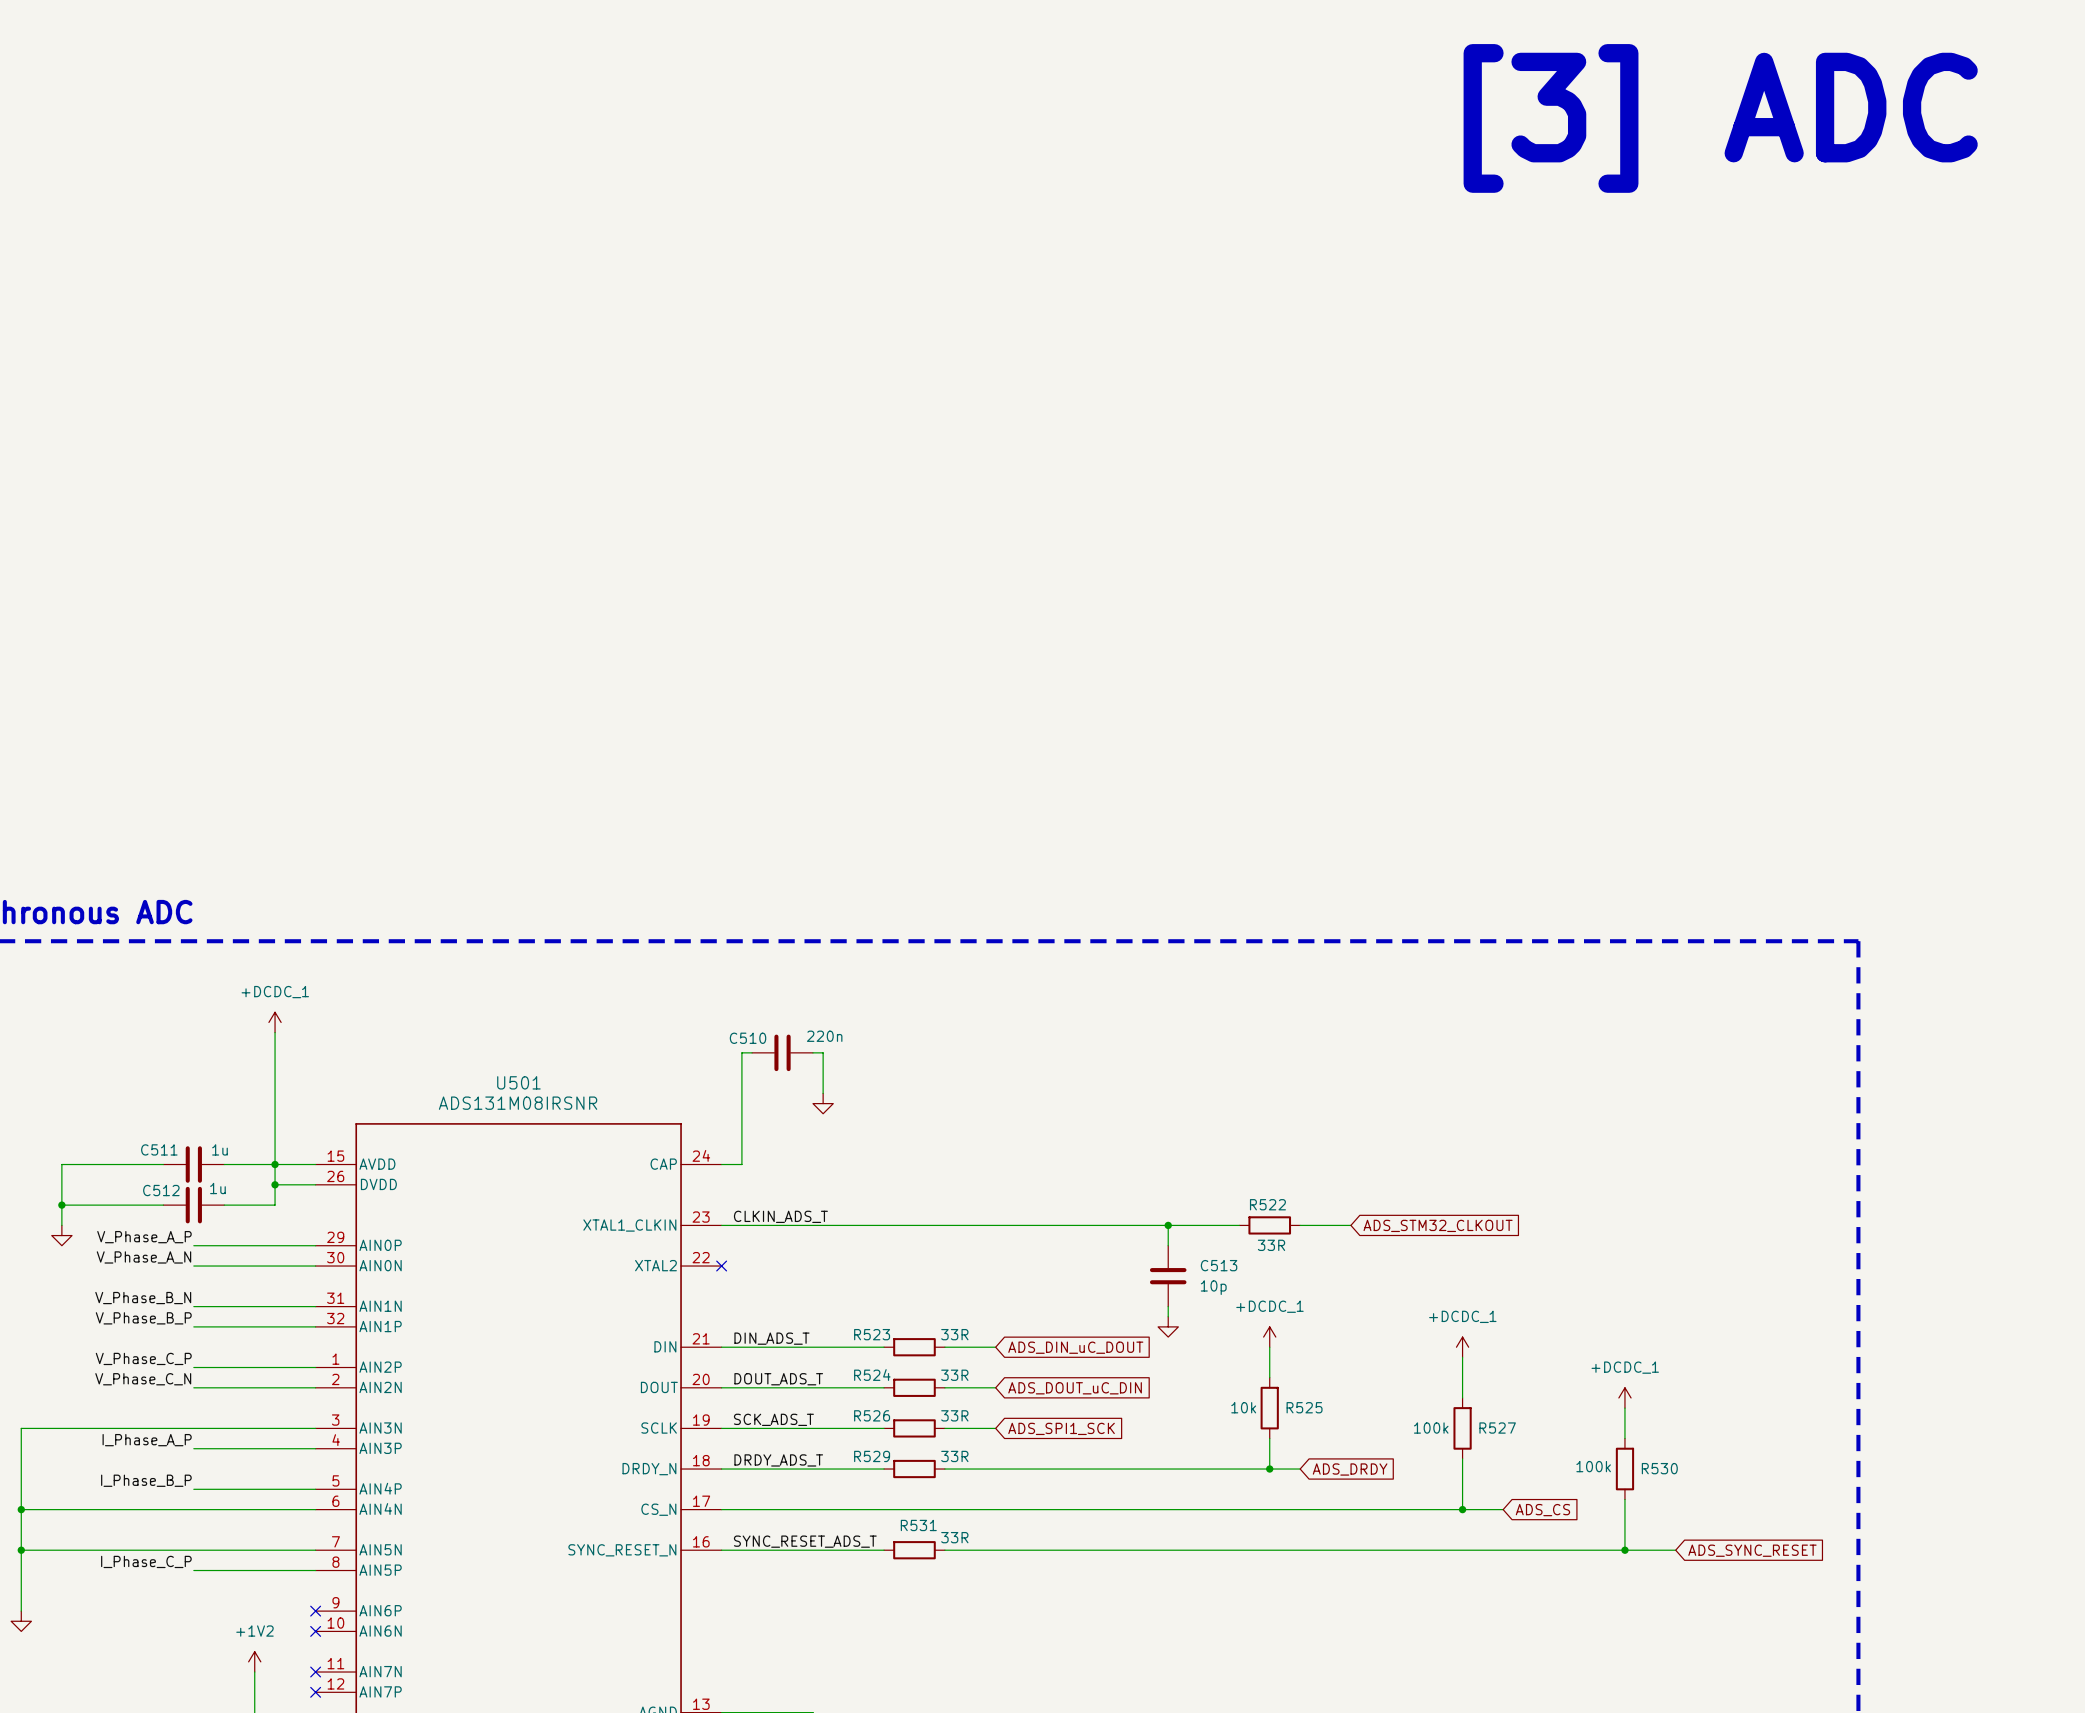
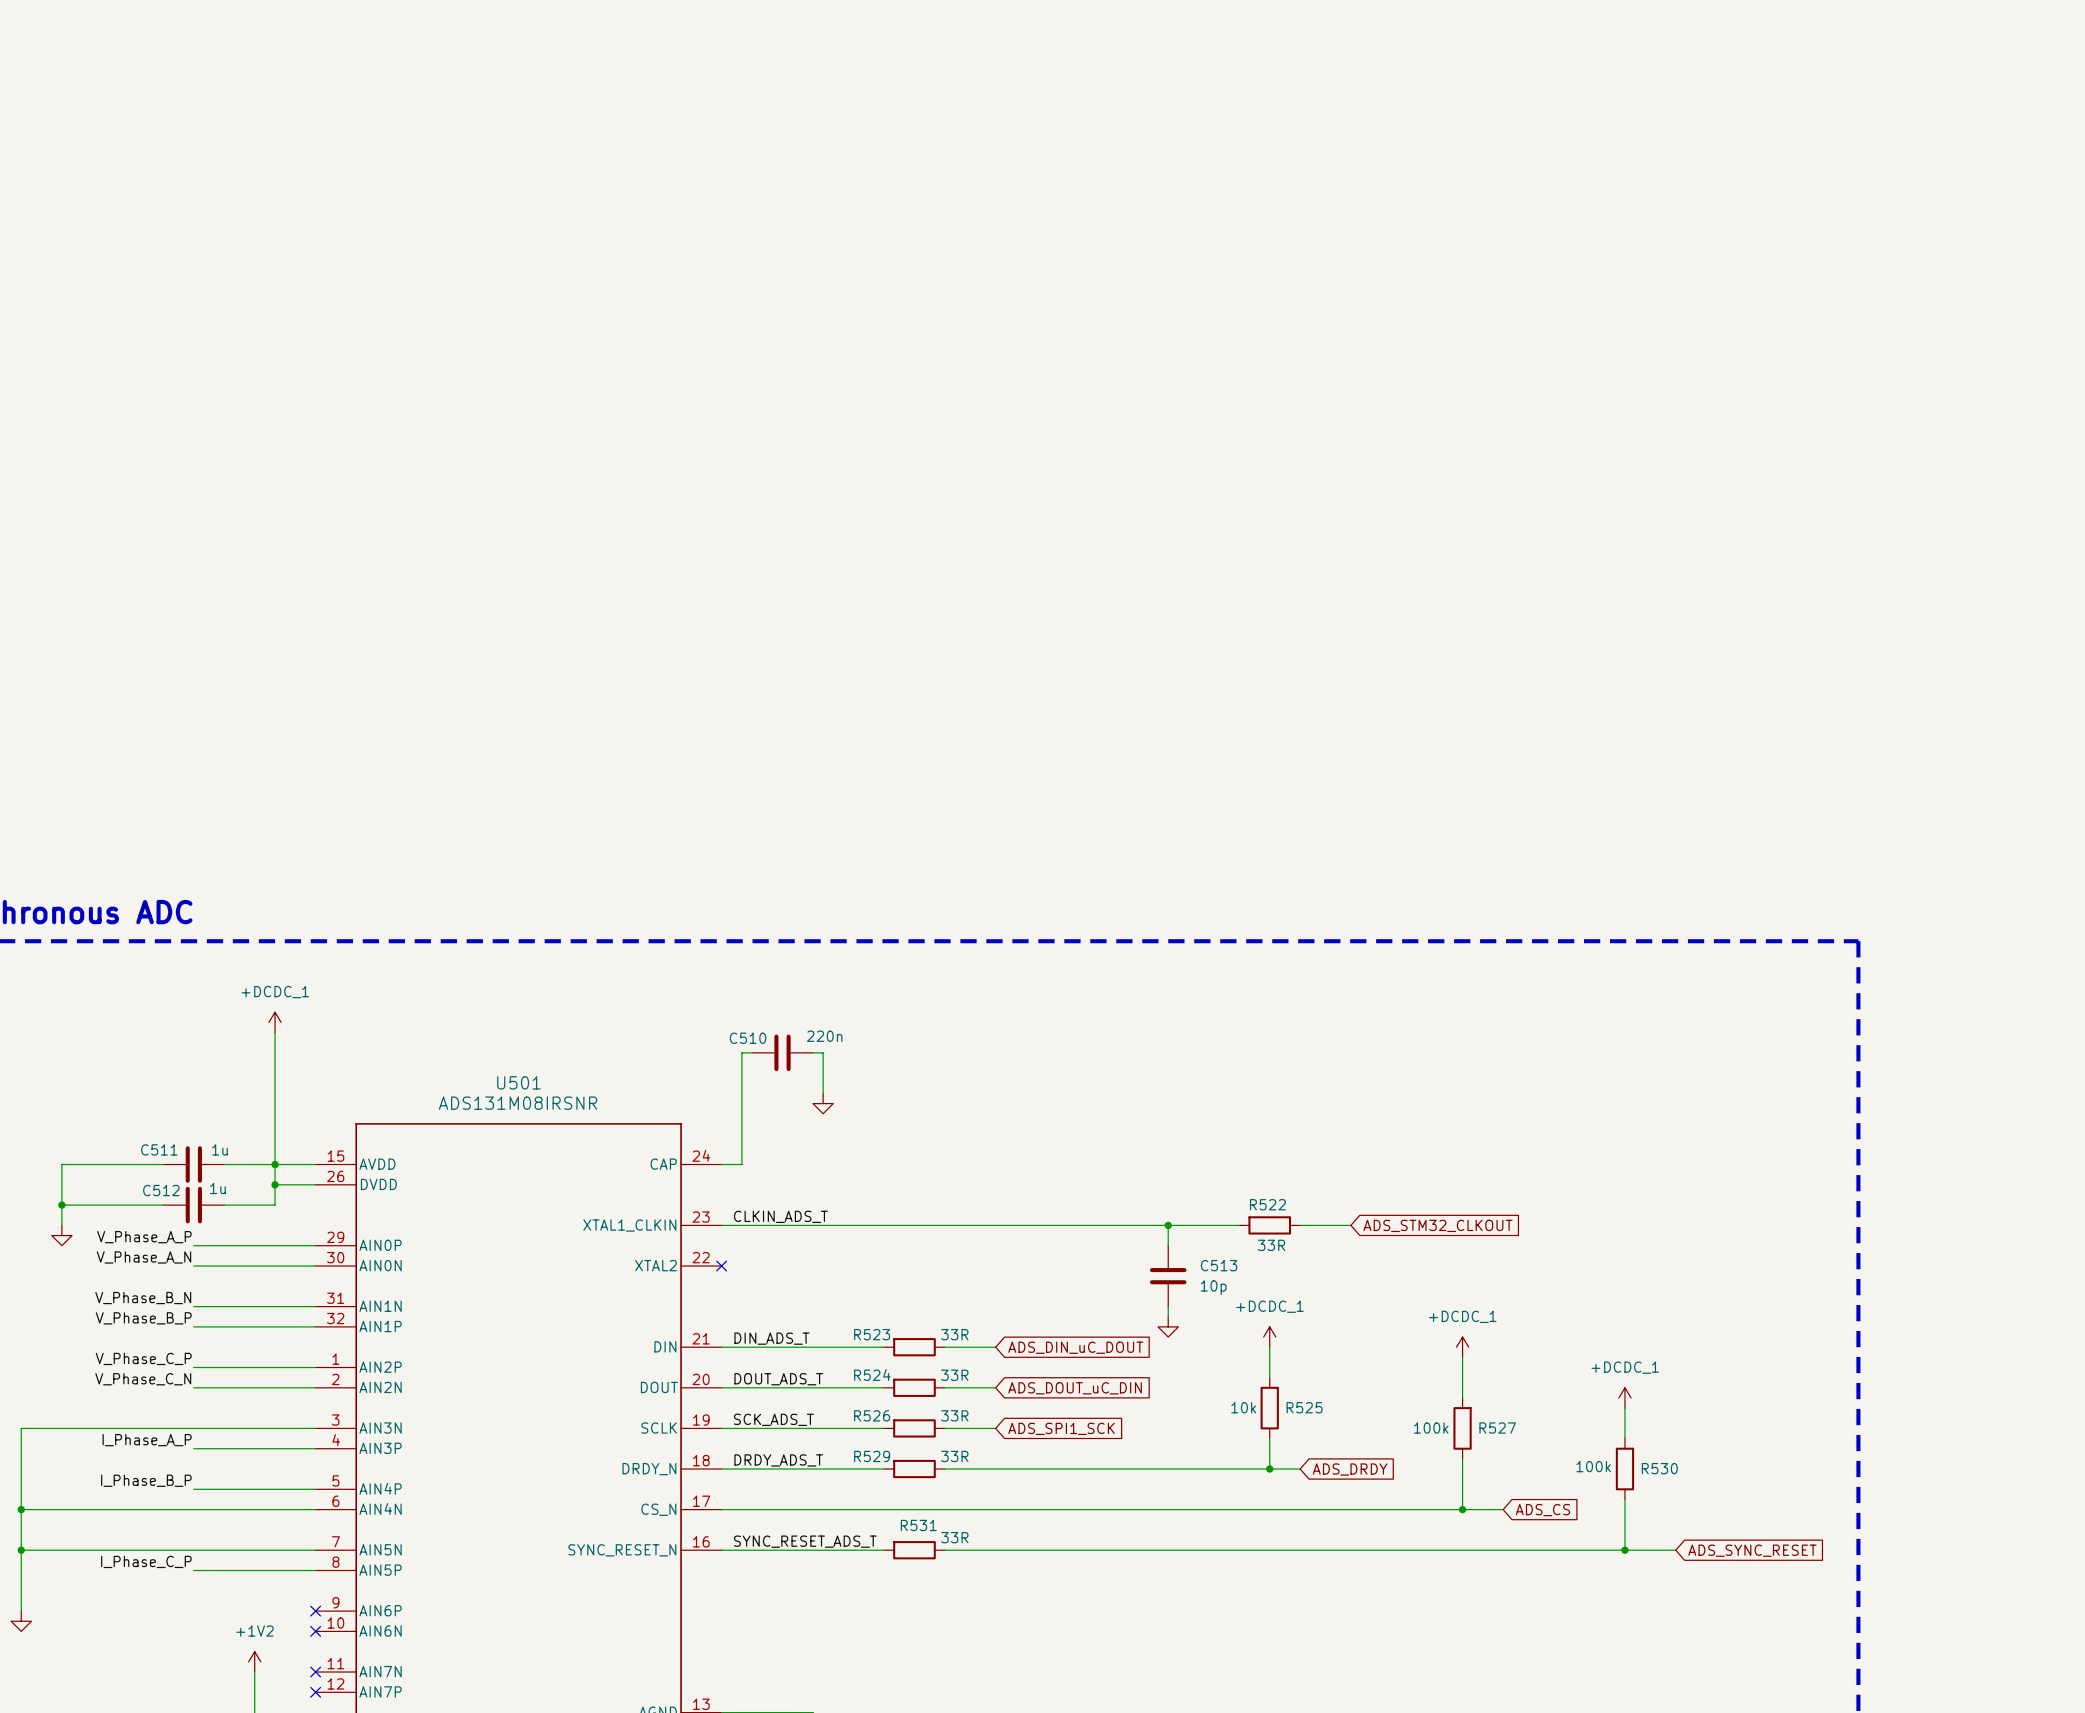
text: [3] ADC (1720, 118) -> none

